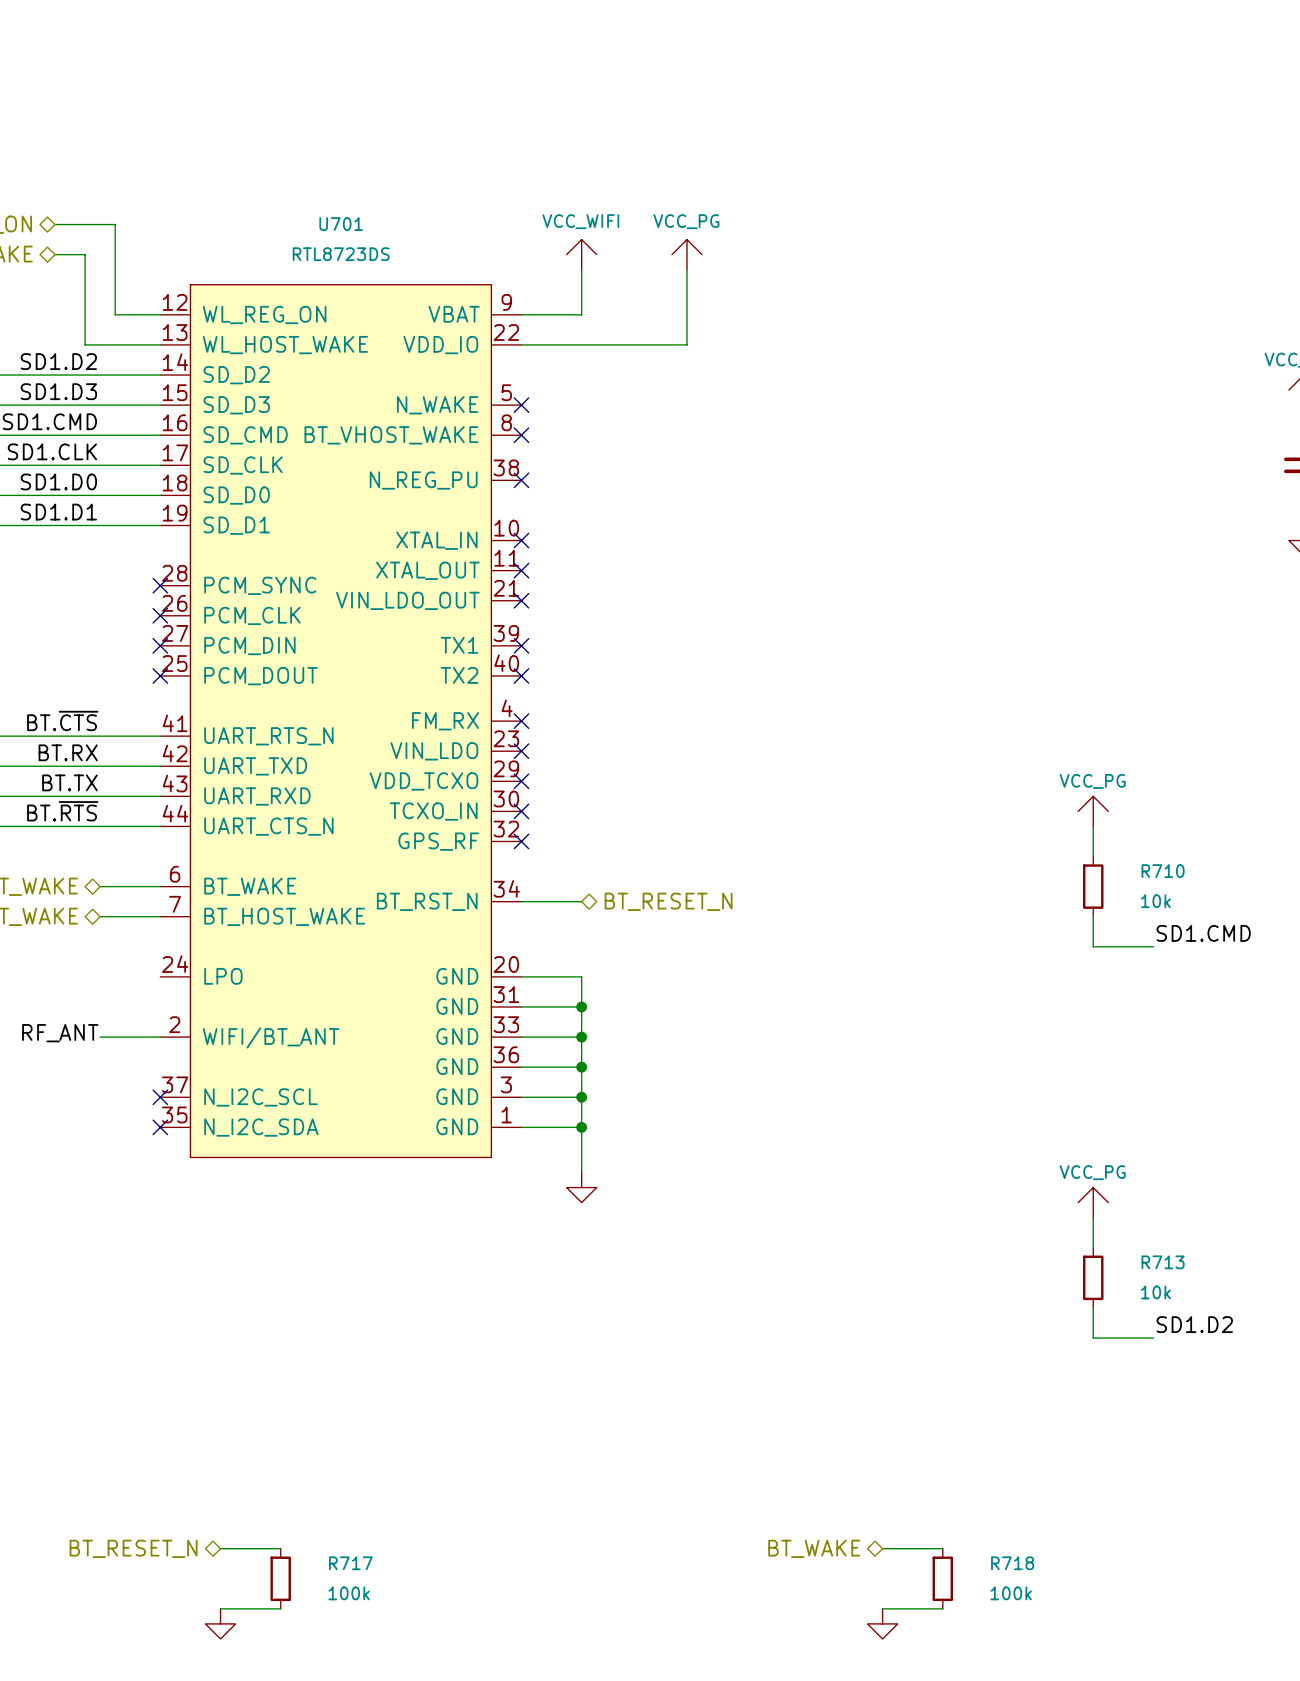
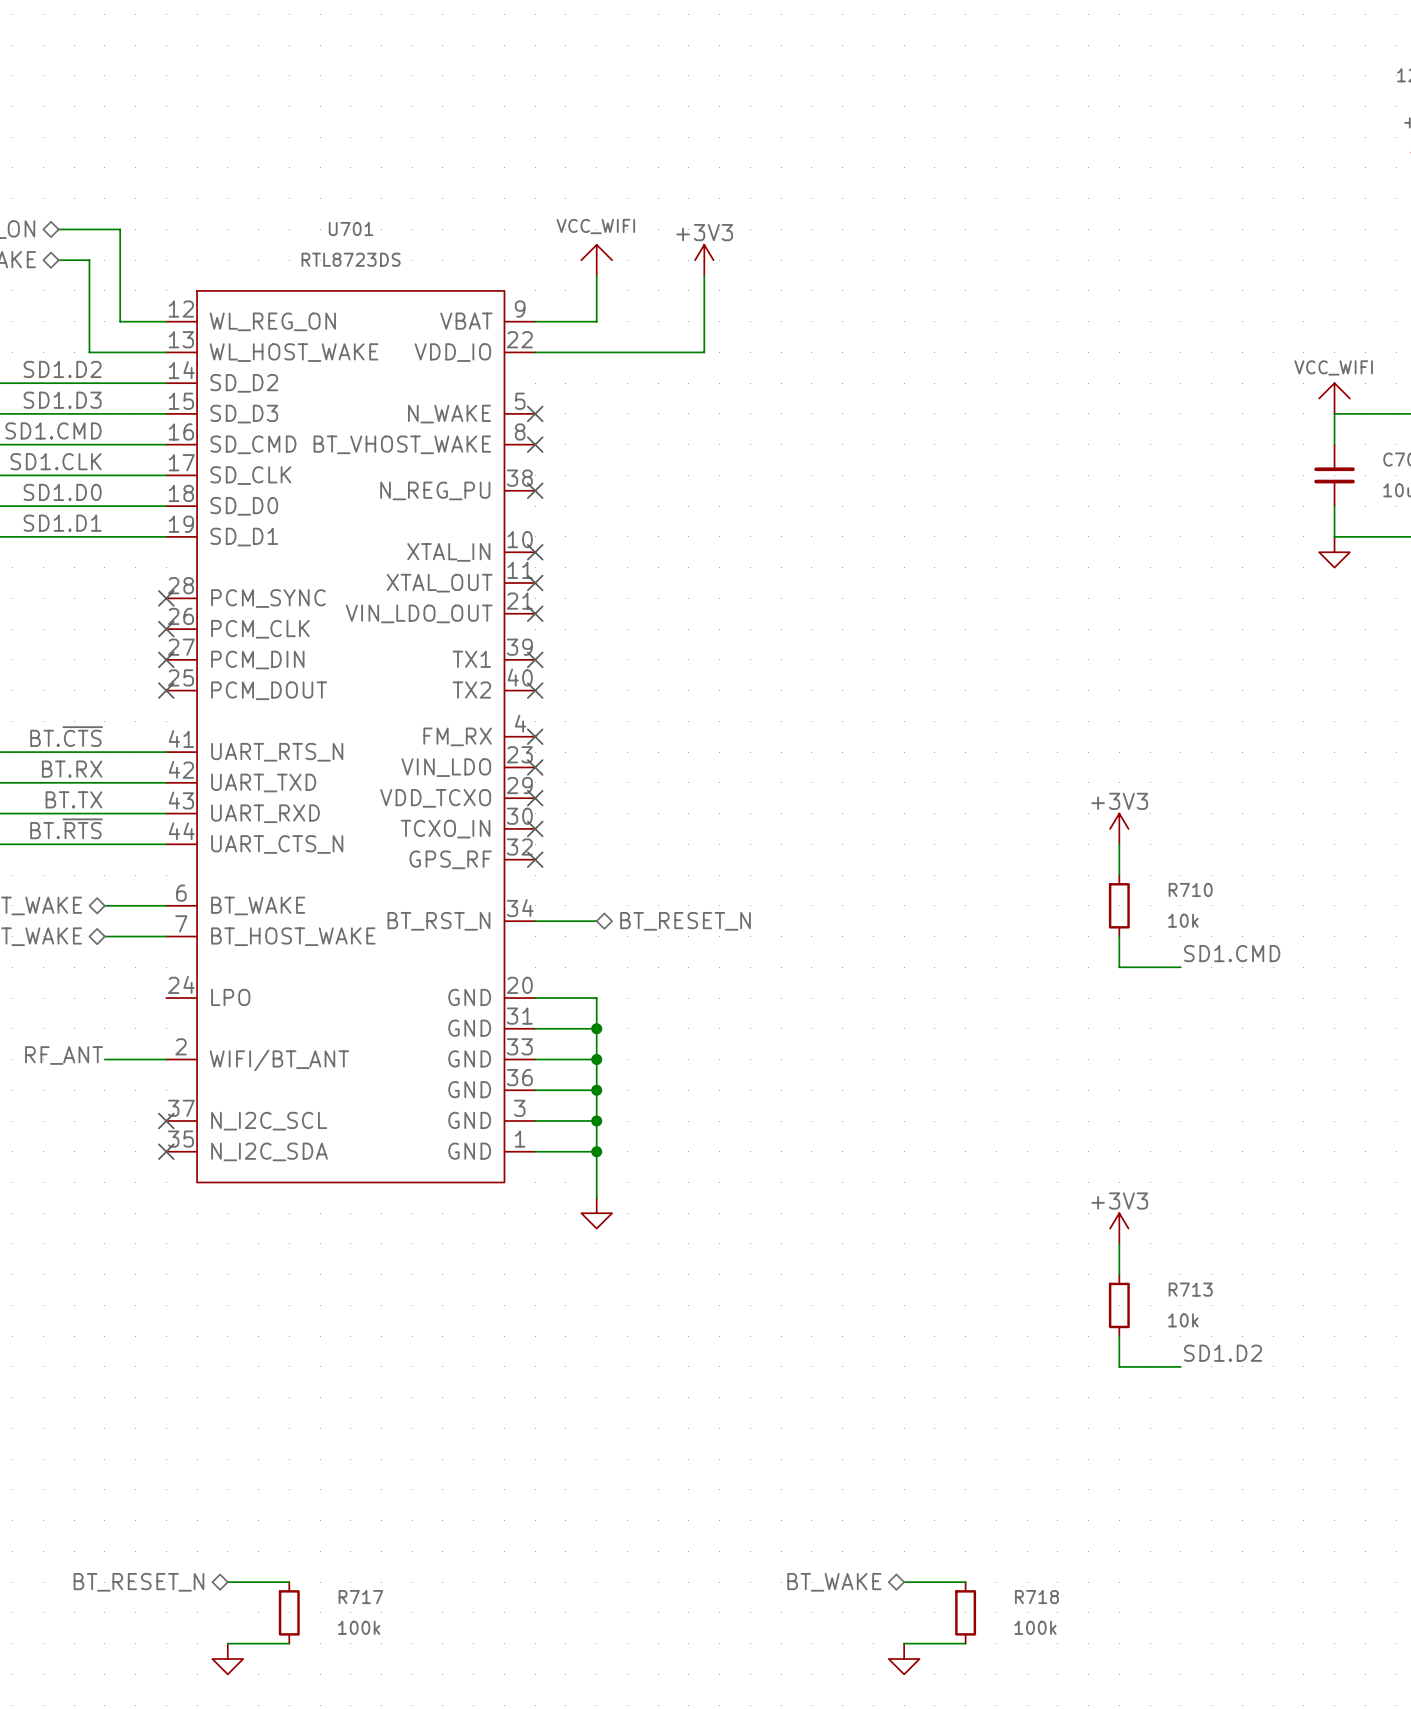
power symbol: VCC_PG (686, 254) -> +3V3 (704, 260)
power symbol: VCC_PG (1093, 811) -> +3V3 (1119, 828)
power symbol: VCC_PG (1093, 1202) -> +3V3 (1119, 1228)

